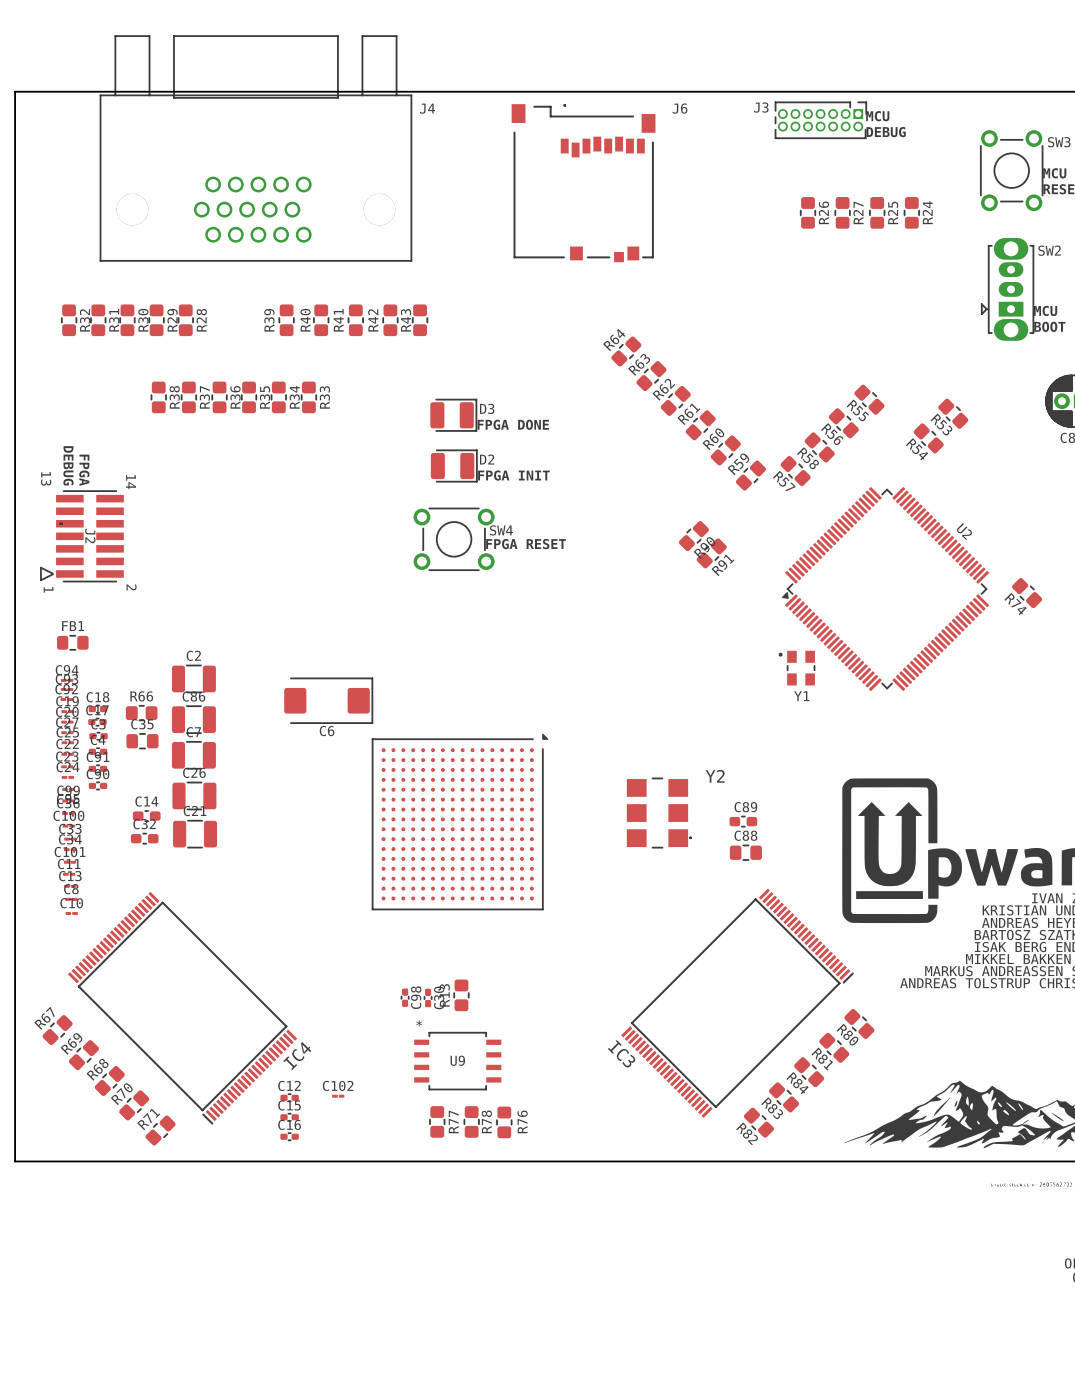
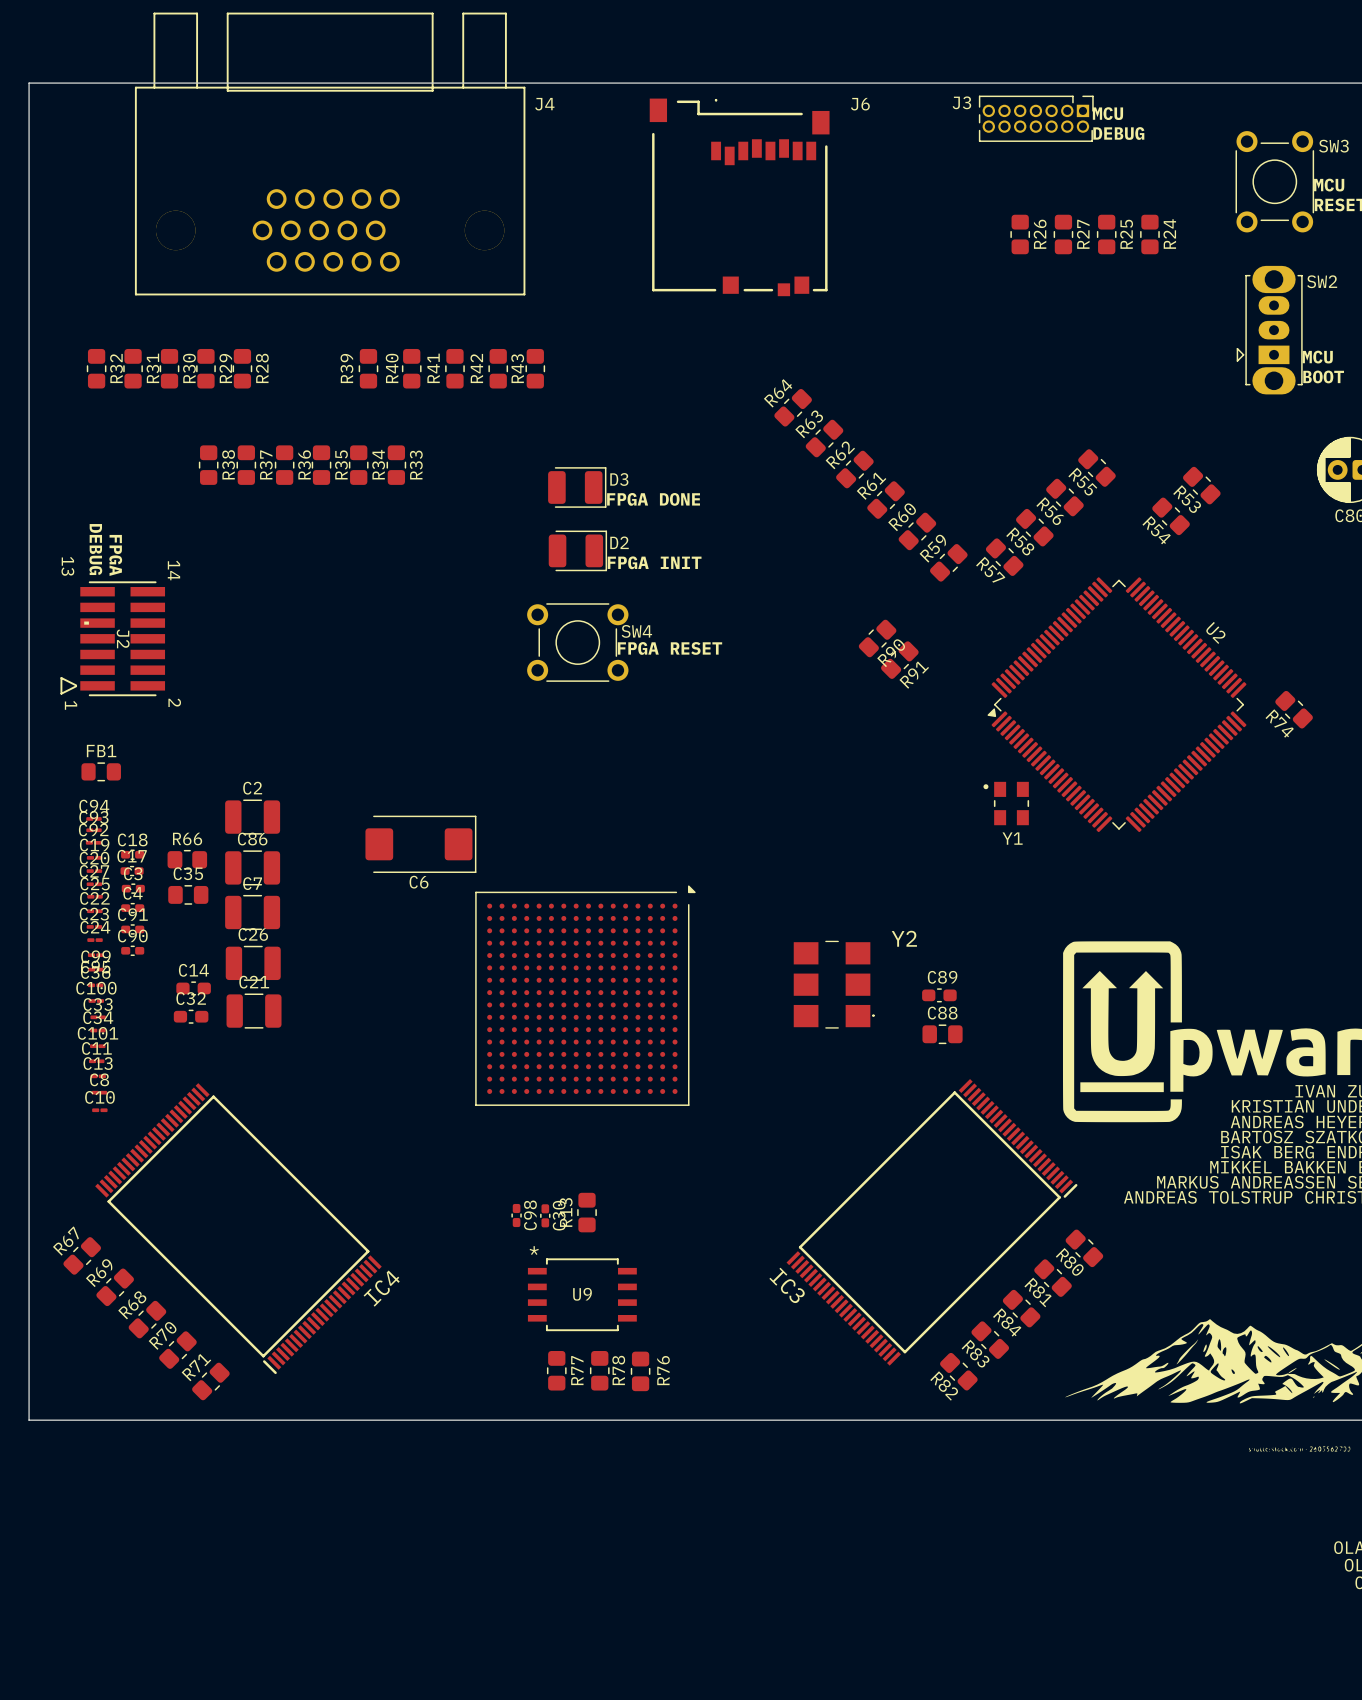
C102: (338, 1096) -> none
C12: (289, 1097) -> none
C15: (289, 1117) -> none
C16: (289, 1136) -> none

